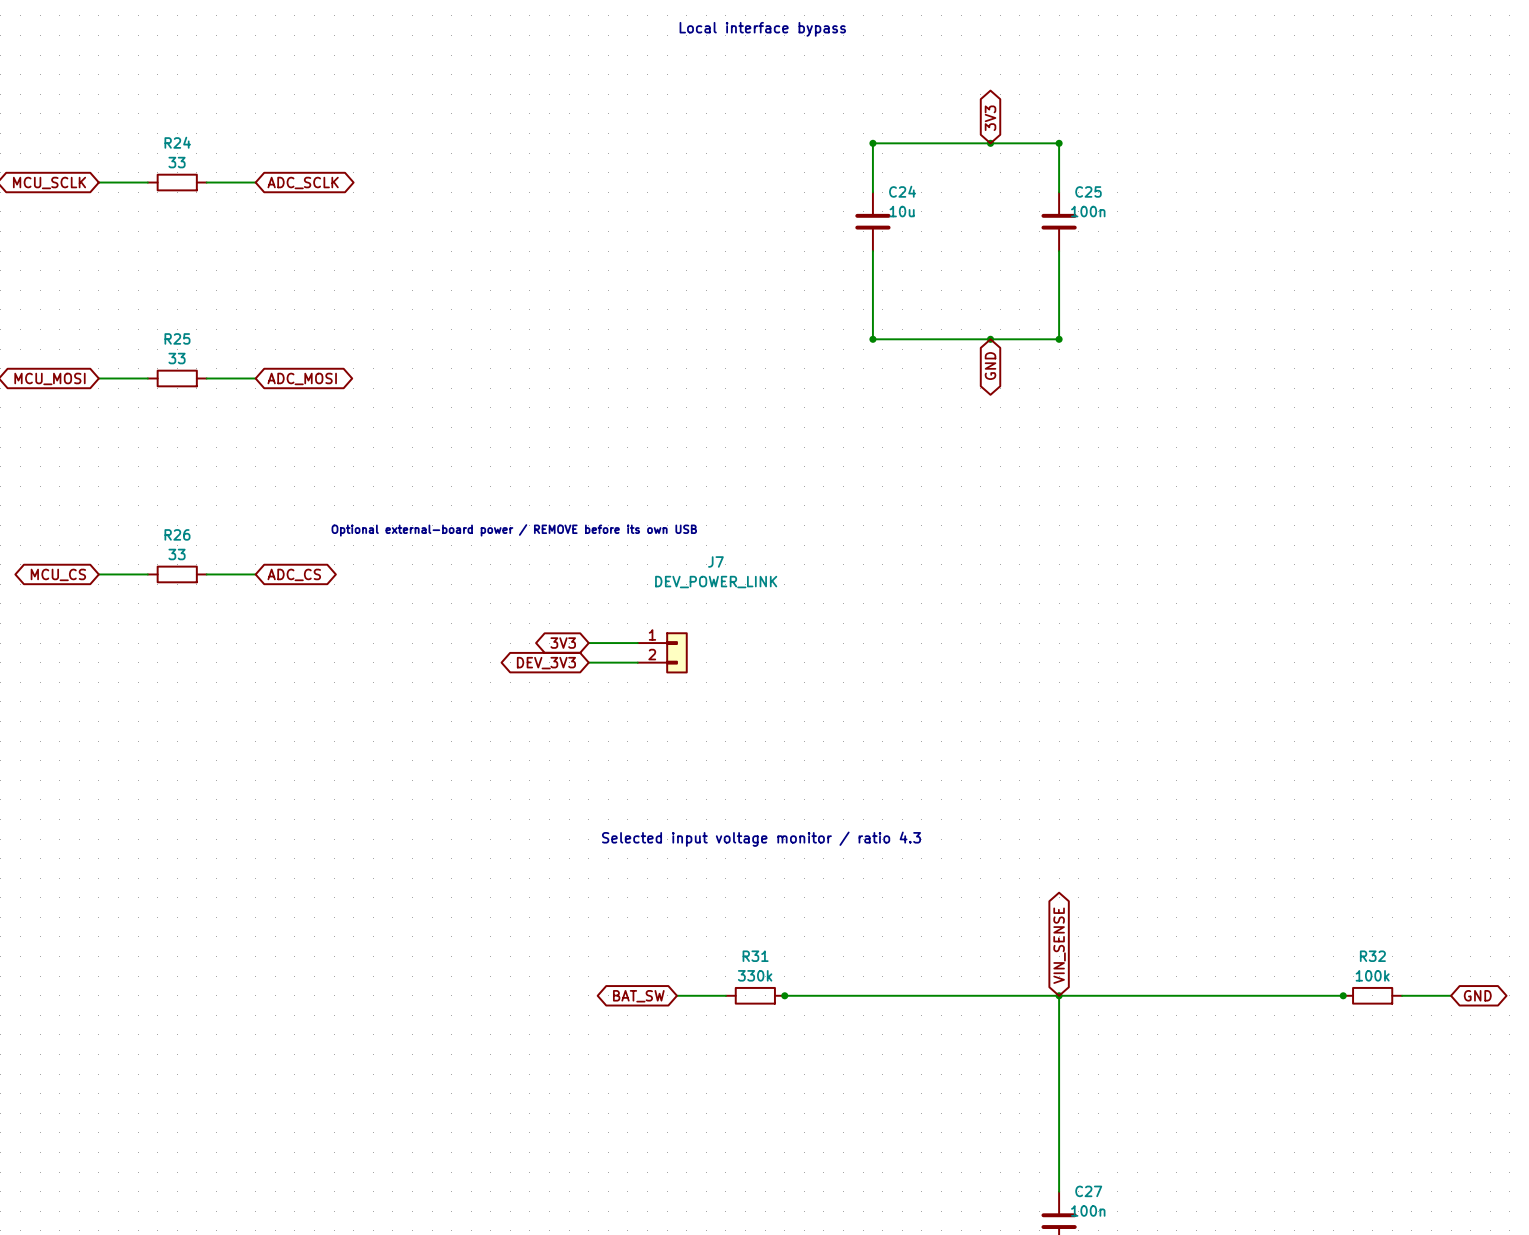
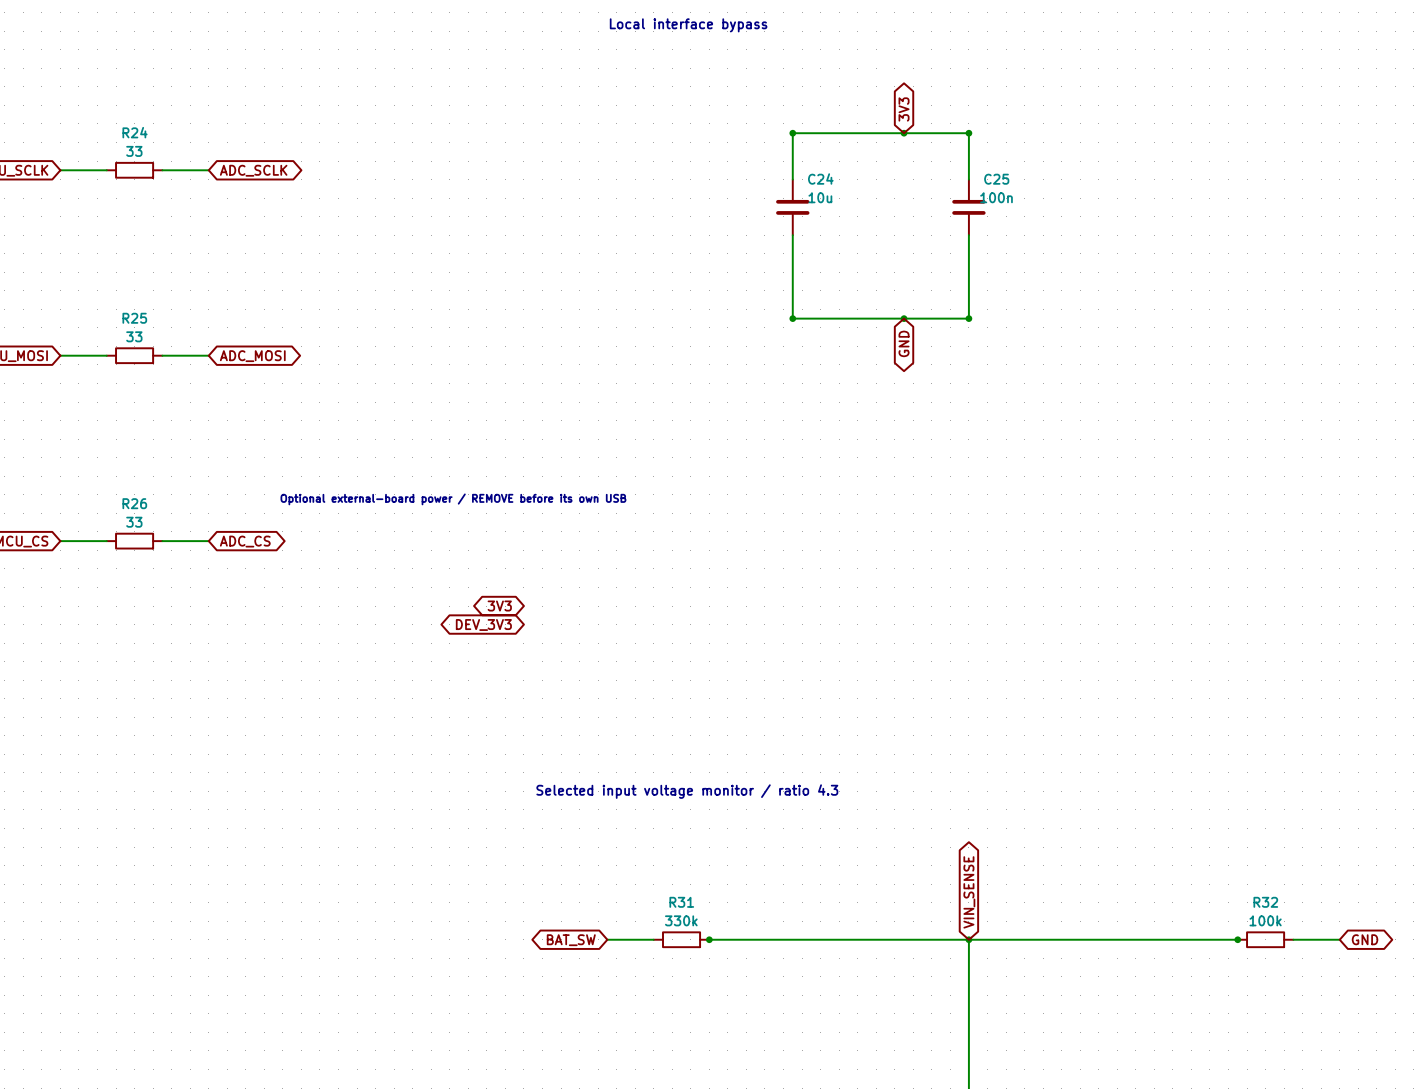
wire: (588, 643) (637, 643) -> none
J7: DEV_POWER_LINK (662, 652) -> none
wire: (588, 662) (637, 662) -> none

